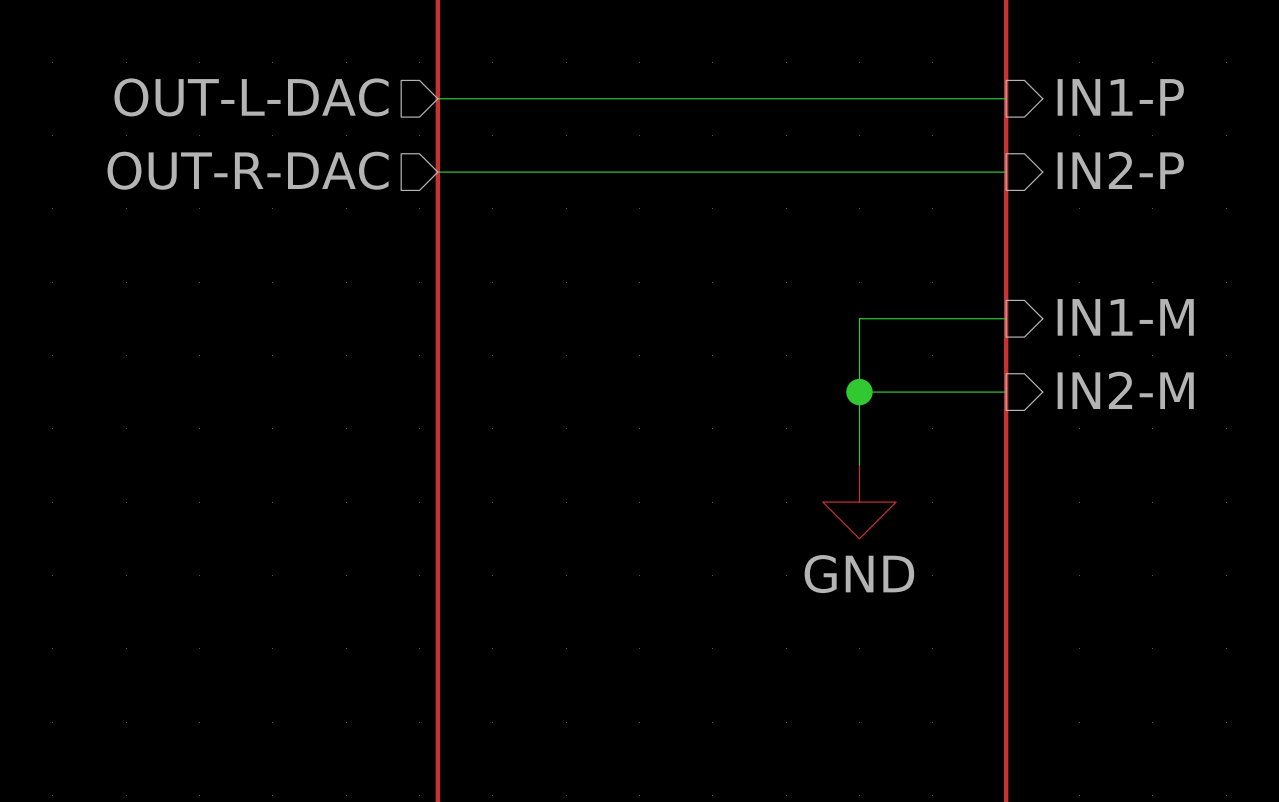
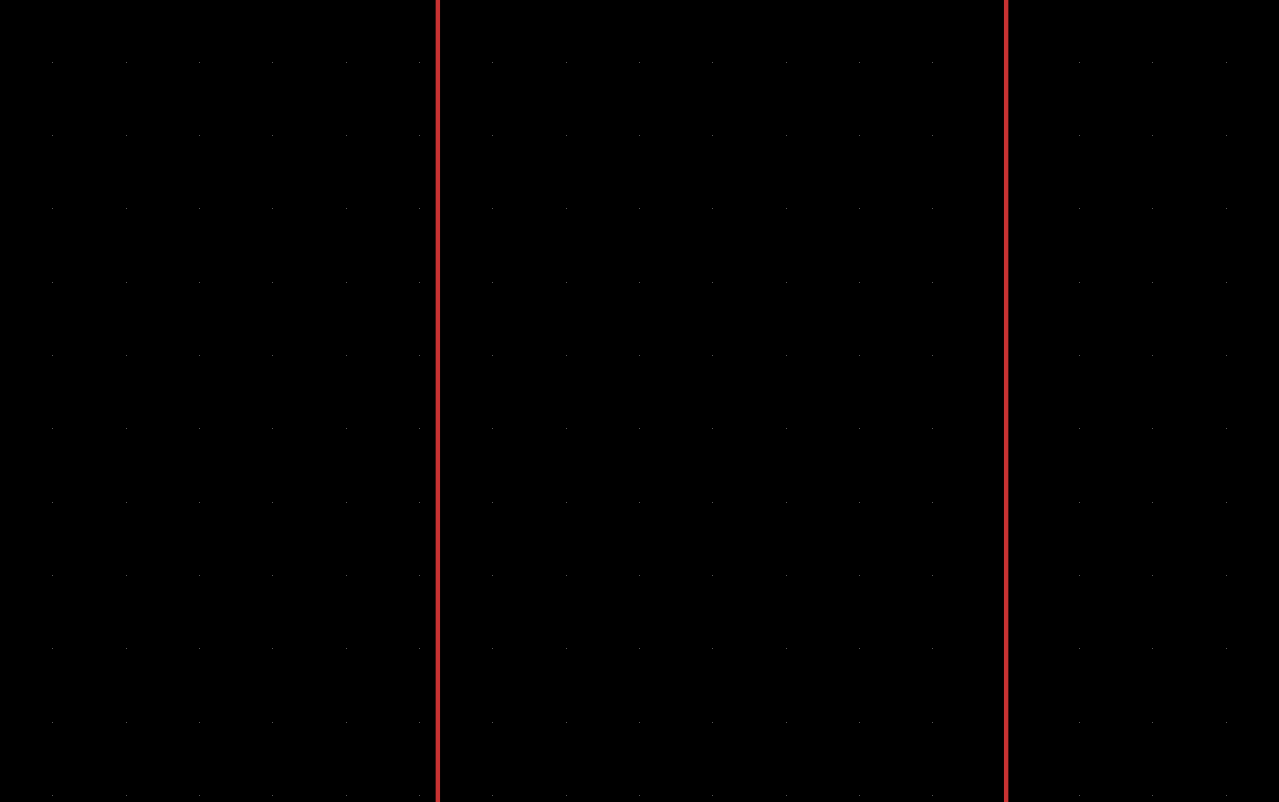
sheet pin: OUT-L-DAC (251, 97) -> none
sheet pin: IN1-P (1120, 97) -> none
wire: (437, 98) (1006, 98) -> none
sheet pin: OUT-R-DAC (248, 170) -> none
sheet pin: IN2-P (1120, 170) -> none
wire: (437, 172) (1006, 172) -> none
sheet pin: IN1-M (1125, 317) -> none
wire: (1006, 318) (859, 318) (859, 465) -> none
sheet pin: IN2-M (1125, 390) -> none
wire: (859, 392) (1006, 392) -> none
junction: (859, 392) -> none
power symbol: GND (859, 502) -> none

